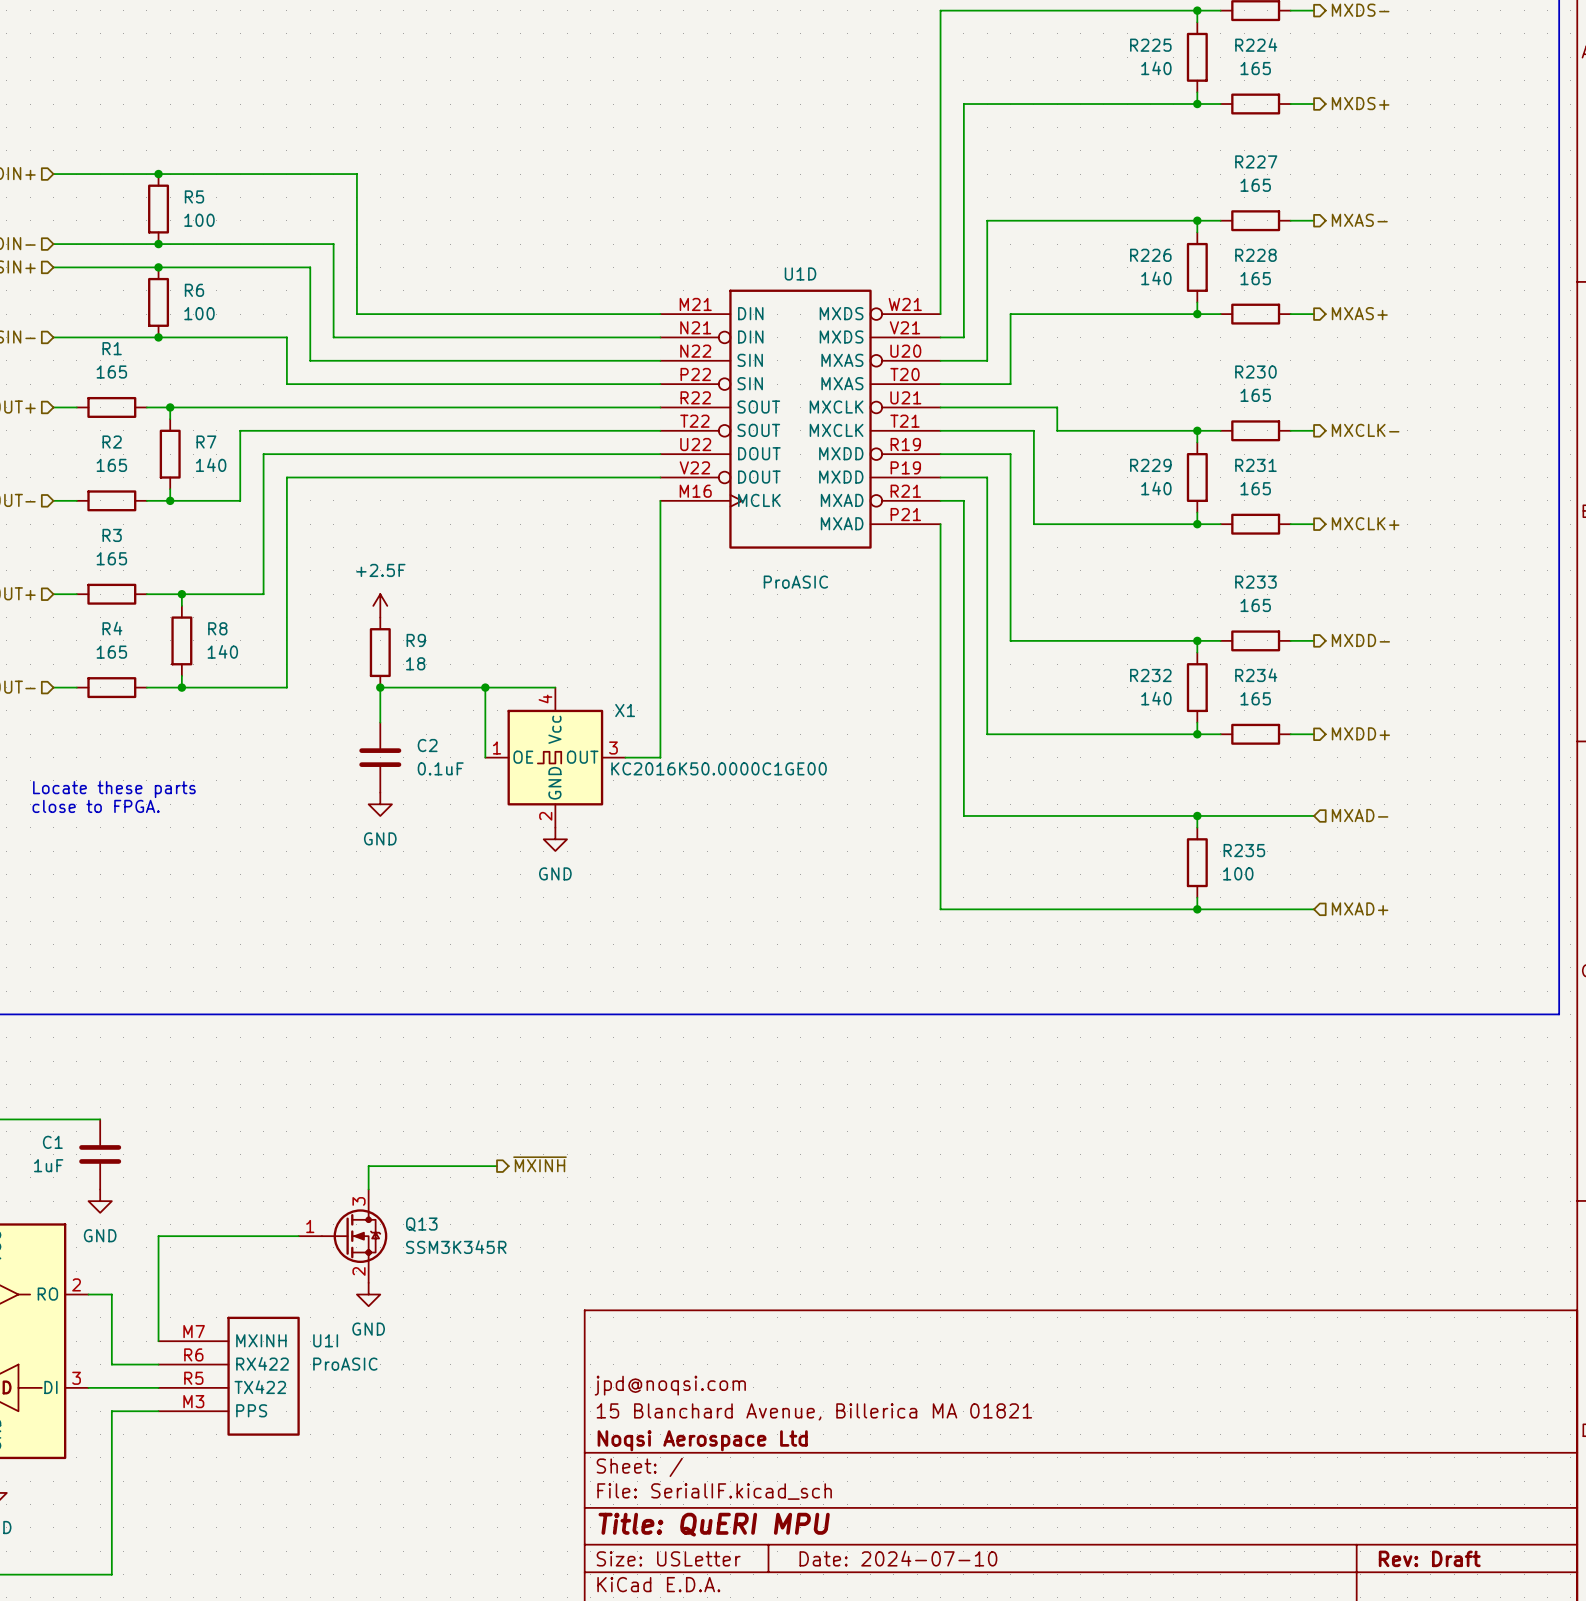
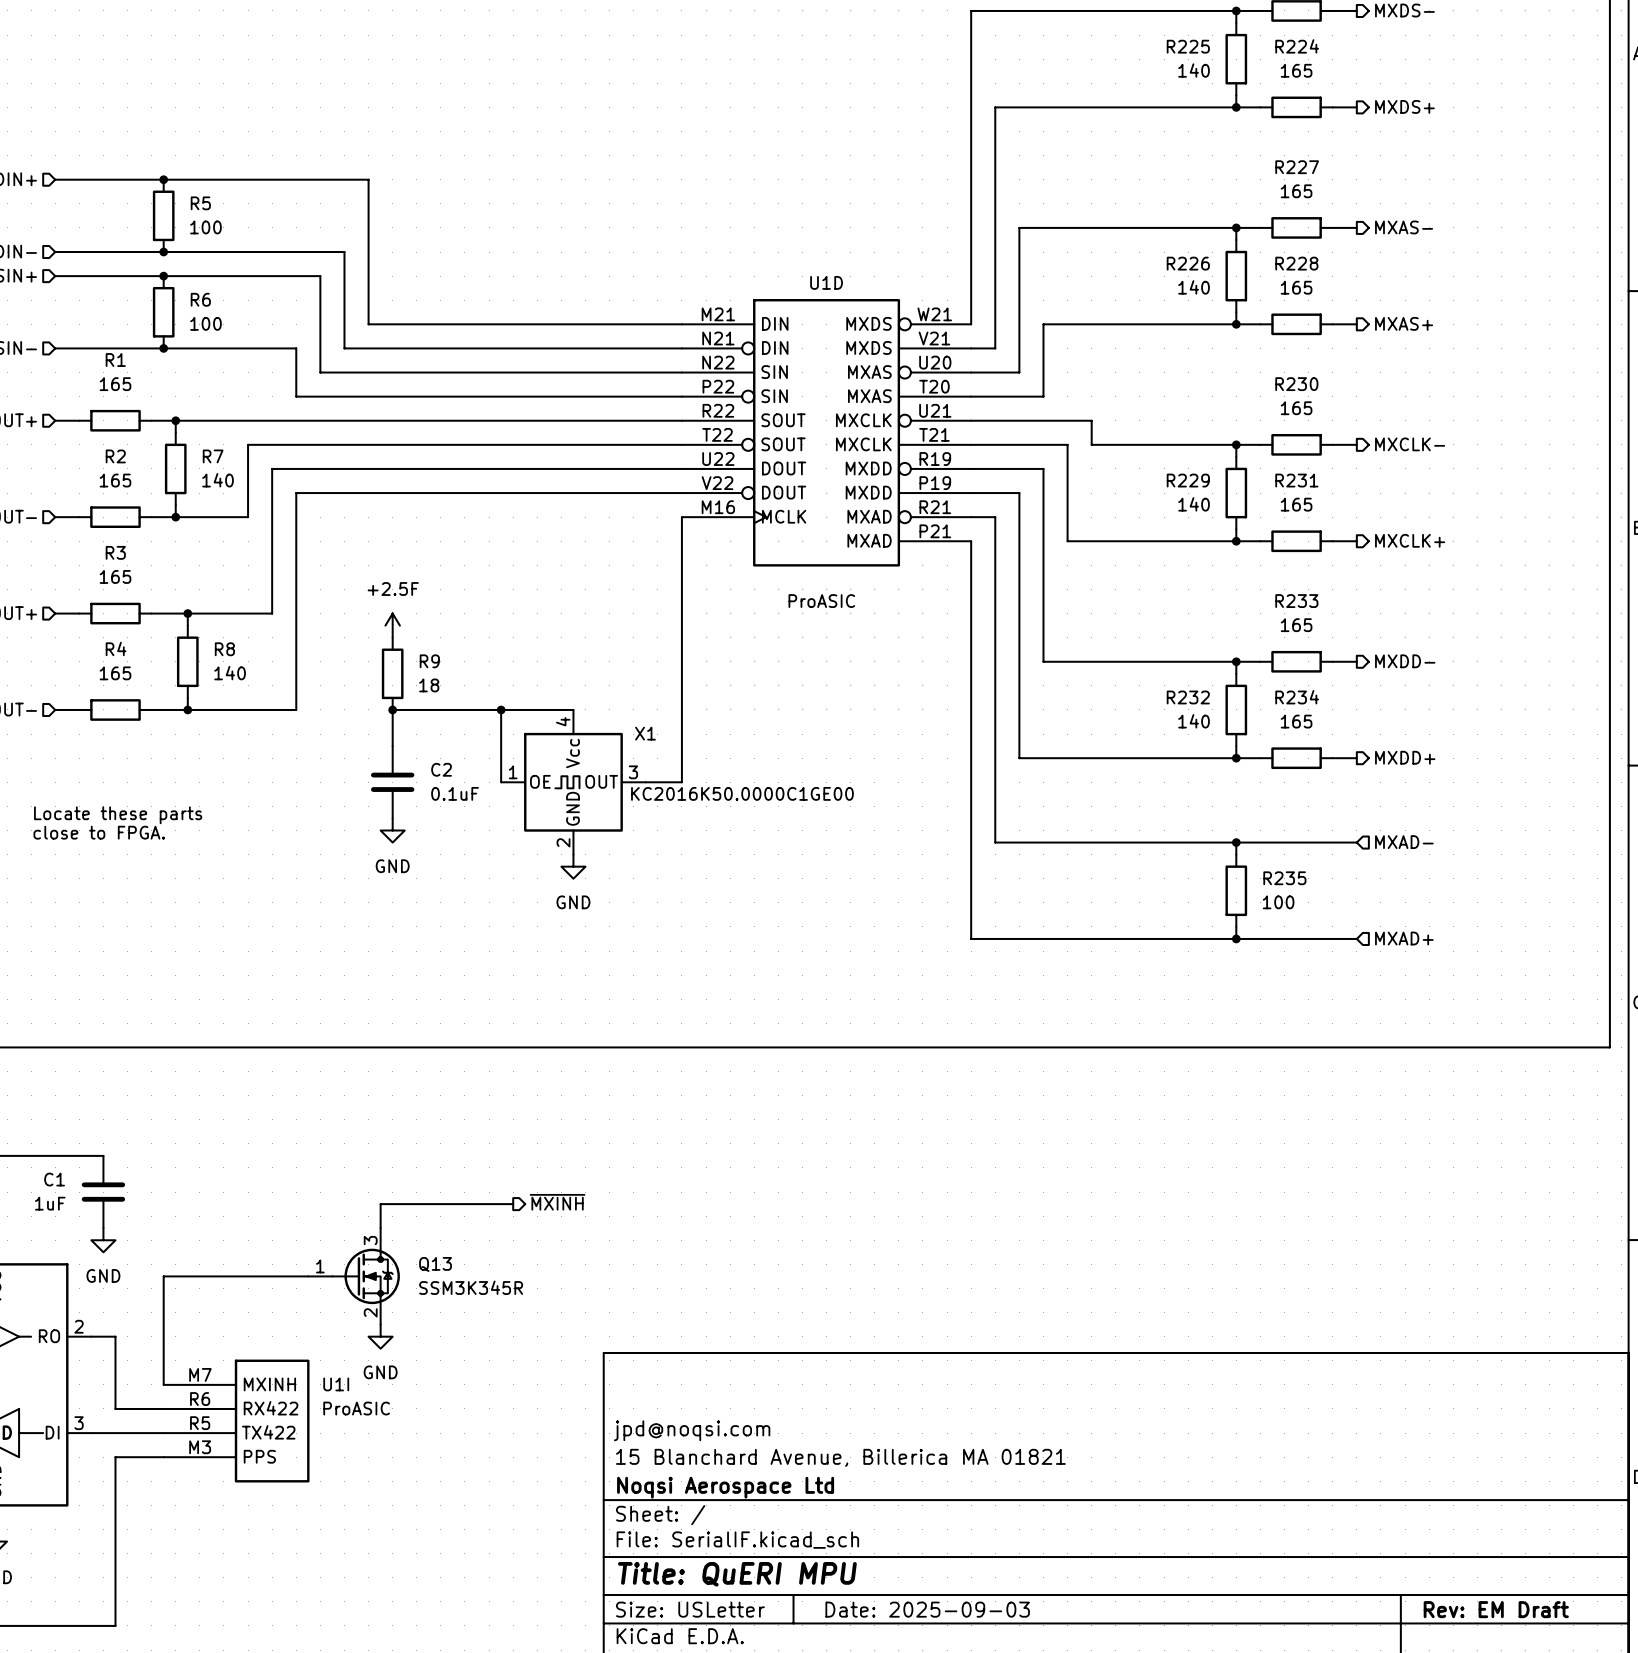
title block: Date: 2024-07-10 (898, 1558) -> Date: 2025-09-03 (927, 1609)
title block: Rev: Draft (1429, 1558) -> Rev: EM Draft (1496, 1609)

